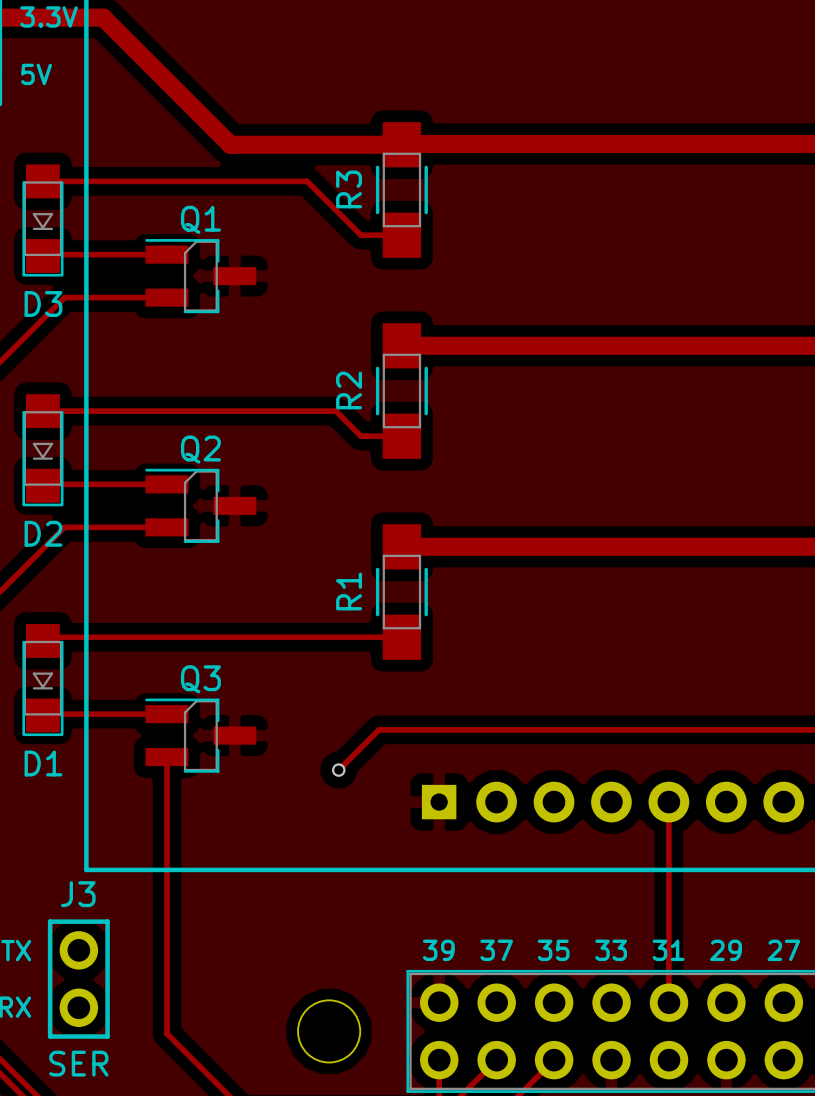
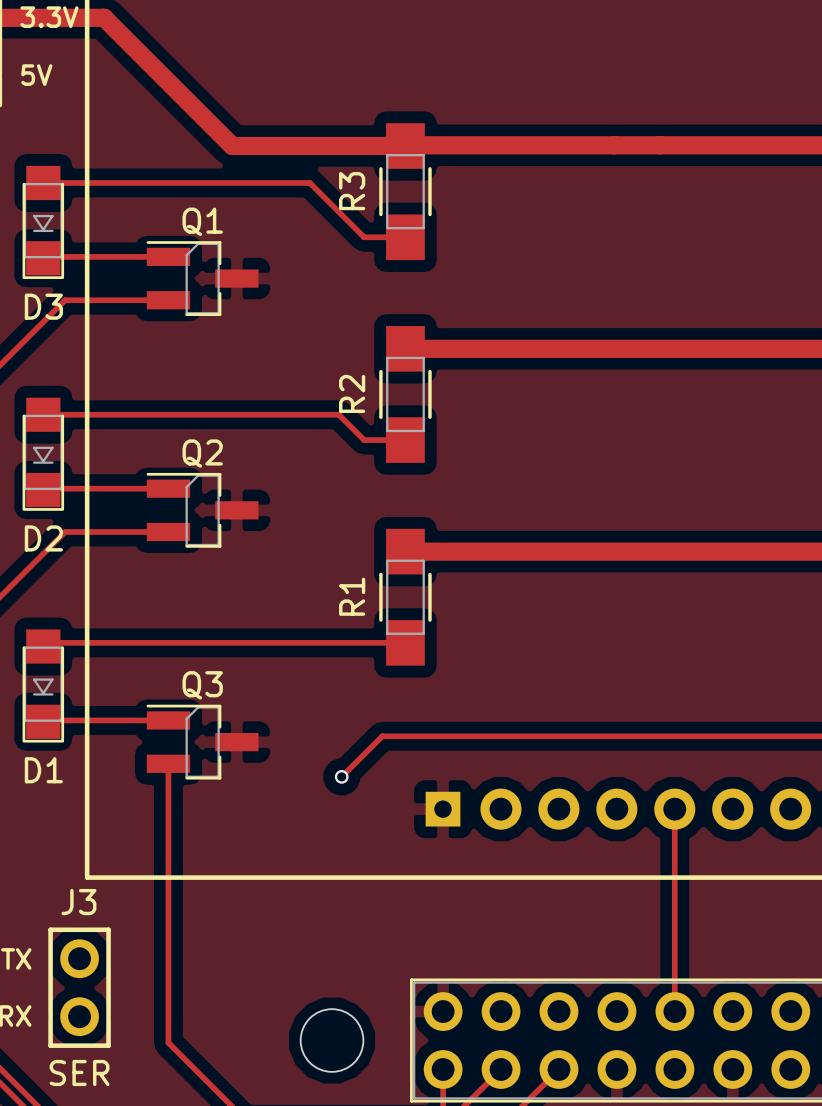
text: 39 (438, 950) -> none
text: 37 (496, 950) -> none
text: 35 (553, 950) -> none
text: 33 (611, 950) -> none
text: 31 (668, 950) -> none
text: 29 (726, 950) -> none
text: 27 (783, 950) -> none

